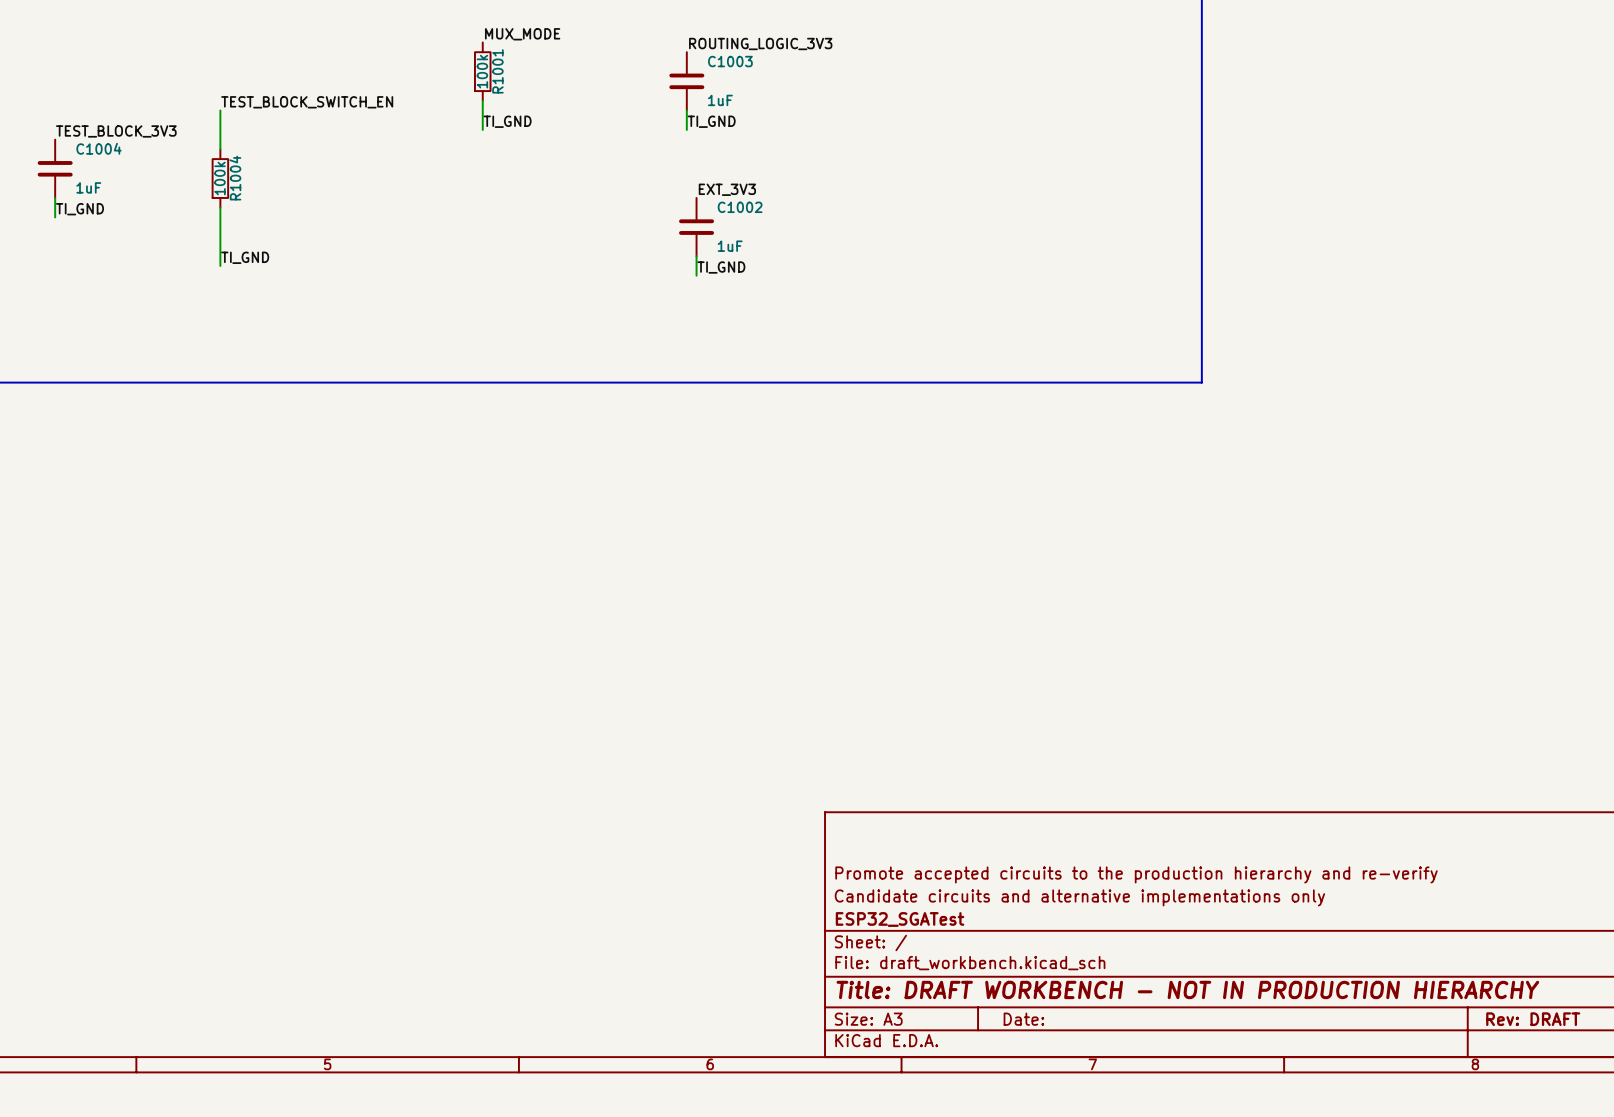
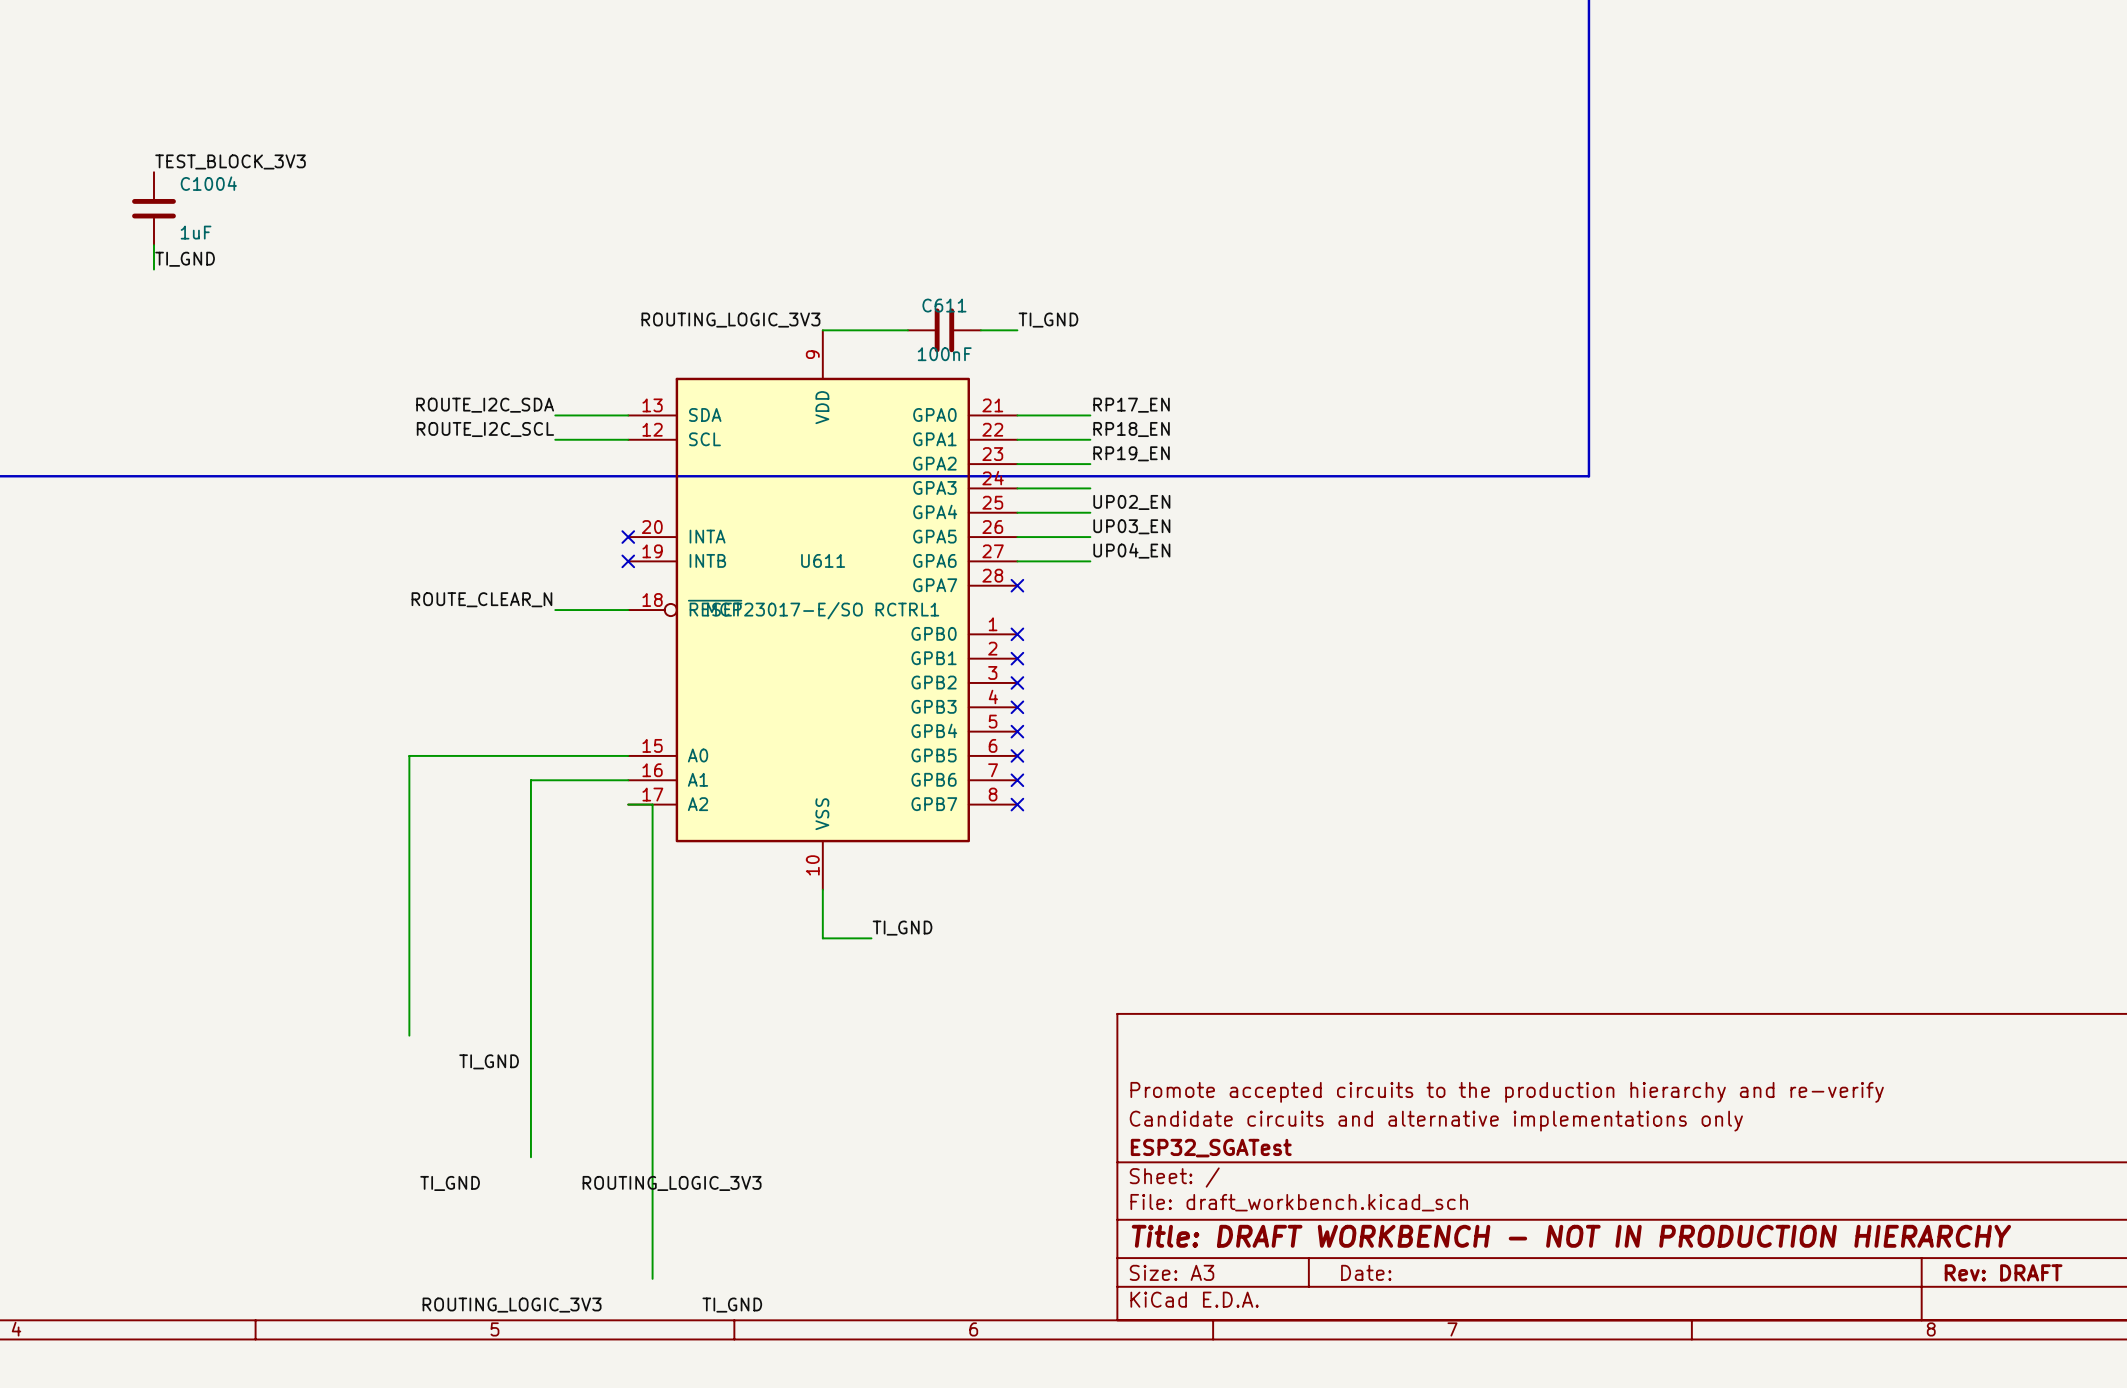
label: MUX_MODE (522, 34) -> none
label: ROUTING_LOGIC_3V3 (760, 43) -> none
R1001: 100k (482, 71) -> none
C1003: 1uF (686, 81) -> none
wire: (482, 100) (482, 129) -> none
label: TEST_BLOCK_SWITCH_EN (307, 102) -> none
wire: (220, 110) (220, 149) -> none
wire: (686, 110) (686, 129) -> none
label: TI_GND (507, 121) -> none
label: TI_GND (711, 121) -> none
R1004: 100k (220, 178) -> none
label: EXT_3V3 (727, 189) -> none
wire: (220, 207) (220, 265) -> none
C1002: 1uF (696, 227) -> none
wire: (696, 256) (696, 275) -> none
label: TI_GND (245, 257) -> none
label: none -> ROUTING_LOGIC_3V3 (730, 320)
wire: none -> (822, 330) (907, 330)
C611: none -> 100nF (944, 330)
wire: none -> (980, 330) (1017, 330)
label position: TI_GND (721, 267) -> TI_GND (1048, 320)
label: none -> ROUTE_I2C_SDA (485, 405)
label: none -> RP17_EN (1131, 405)
wire: none -> (555, 415) (628, 415)
wire: none -> (1017, 415) (1090, 415)
label: none -> ROUTE_I2C_SCL (485, 429)
label: none -> RP18_EN (1131, 429)
wire: none -> (555, 439) (628, 439)
wire: none -> (1017, 439) (1090, 439)
label: none -> RP19_EN (1131, 453)
wire: none -> (1017, 464) (1090, 464)
wire: none -> (1017, 488) (1090, 488)
label: none -> UP02_EN (1131, 502)
wire: none -> (1017, 512) (1090, 512)
label: none -> UP03_EN (1131, 526)
no-connect mark: none -> (628, 537)
wire: none -> (1017, 537) (1090, 537)
label: none -> UP04_EN (1131, 550)
no-connect mark: none -> (628, 561)
wire: none -> (1017, 561) (1090, 561)
no-connect mark: none -> (1017, 585)
label: none -> ROUTE_CLEAR_N (481, 599)
wire: none -> (555, 610) (628, 610)
U611: none -> MCP23017-E/SO RCTRL1 (822, 610)
no-connect mark: none -> (1017, 634)
no-connect mark: none -> (1017, 658)
no-connect mark: none -> (1017, 682)
no-connect mark: none -> (1017, 707)
no-connect mark: none -> (1017, 731)
wire: none -> (628, 755) (409, 755) (409, 1035)
no-connect mark: none -> (1017, 755)
wire: none -> (628, 780) (530, 780) (530, 1157)
no-connect mark: none -> (1017, 780)
wire: none -> (628, 804) (652, 804) (652, 1278)
no-connect mark: none -> (1017, 804)
wire: none -> (822, 889) (822, 938) (871, 938)
label: none -> TI_GND (902, 928)
label: none -> TI_GND (489, 1061)
label: none -> TI_GND (450, 1183)
label: none -> ROUTING_LOGIC_3V3 (672, 1183)
label: none -> ROUTING_LOGIC_3V3 (512, 1305)
label: none -> TI_GND (732, 1305)

